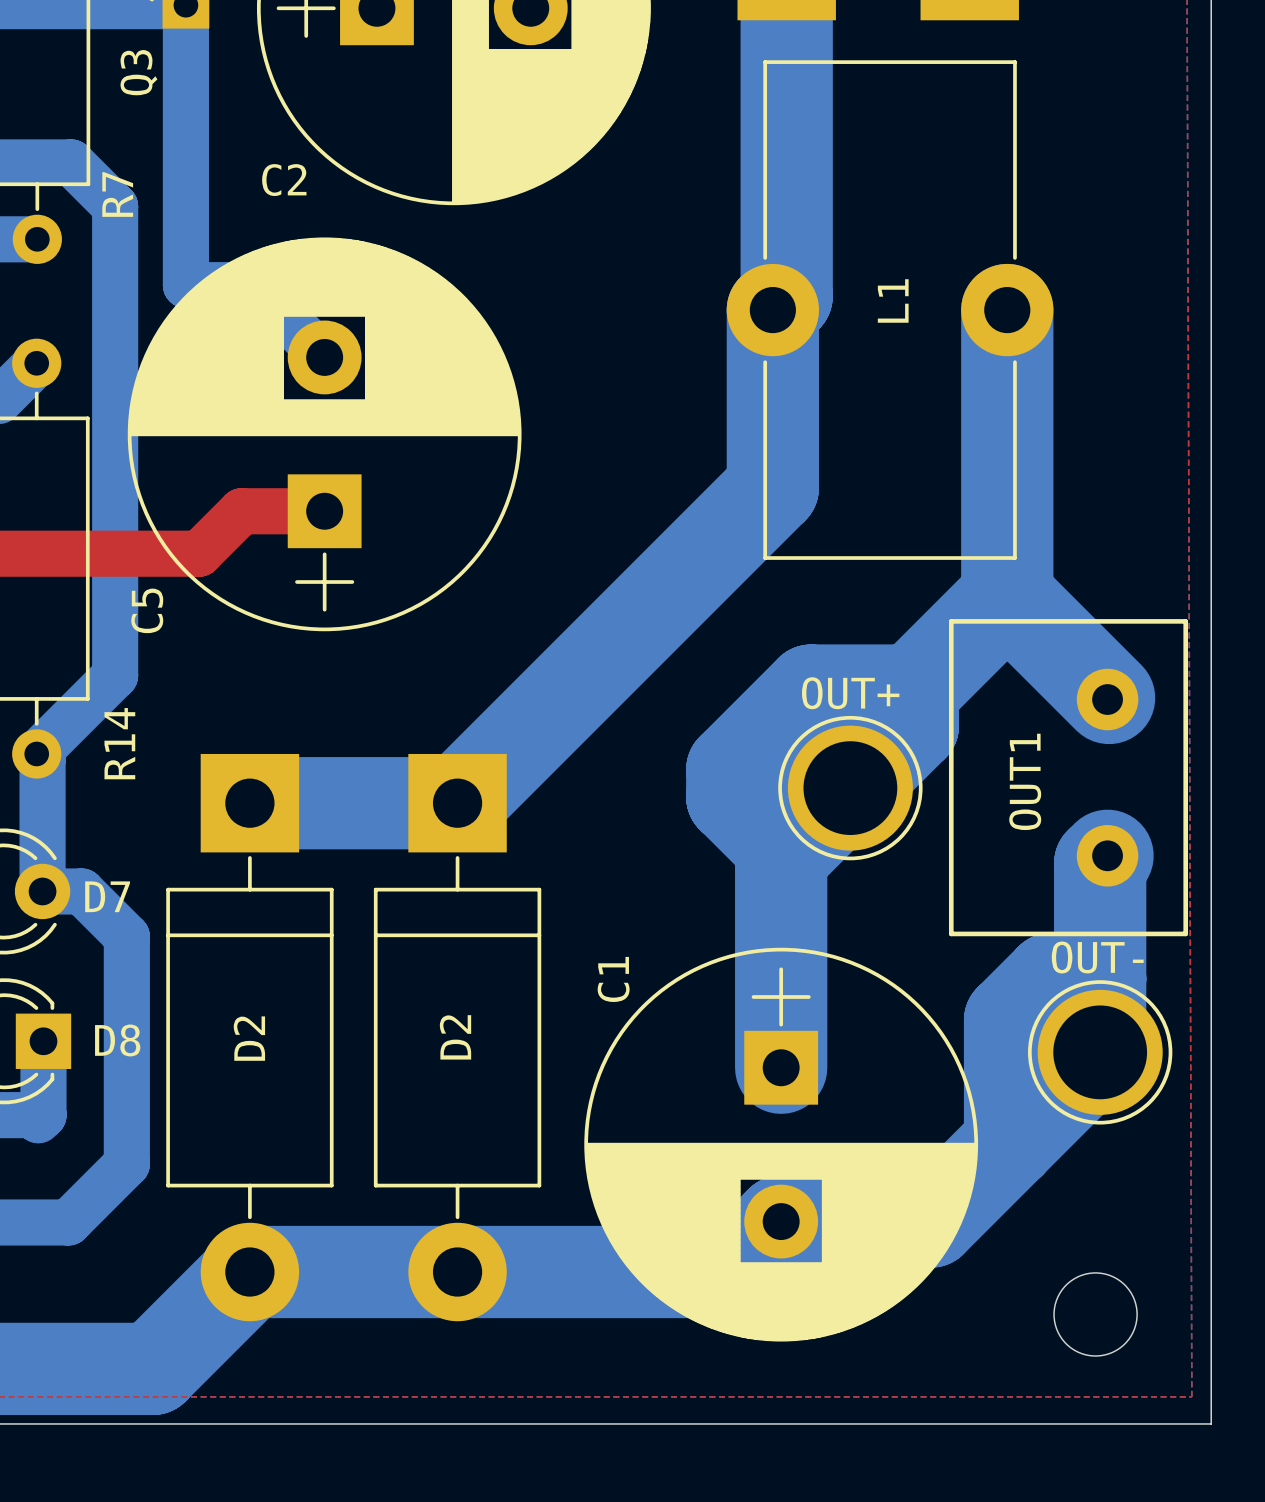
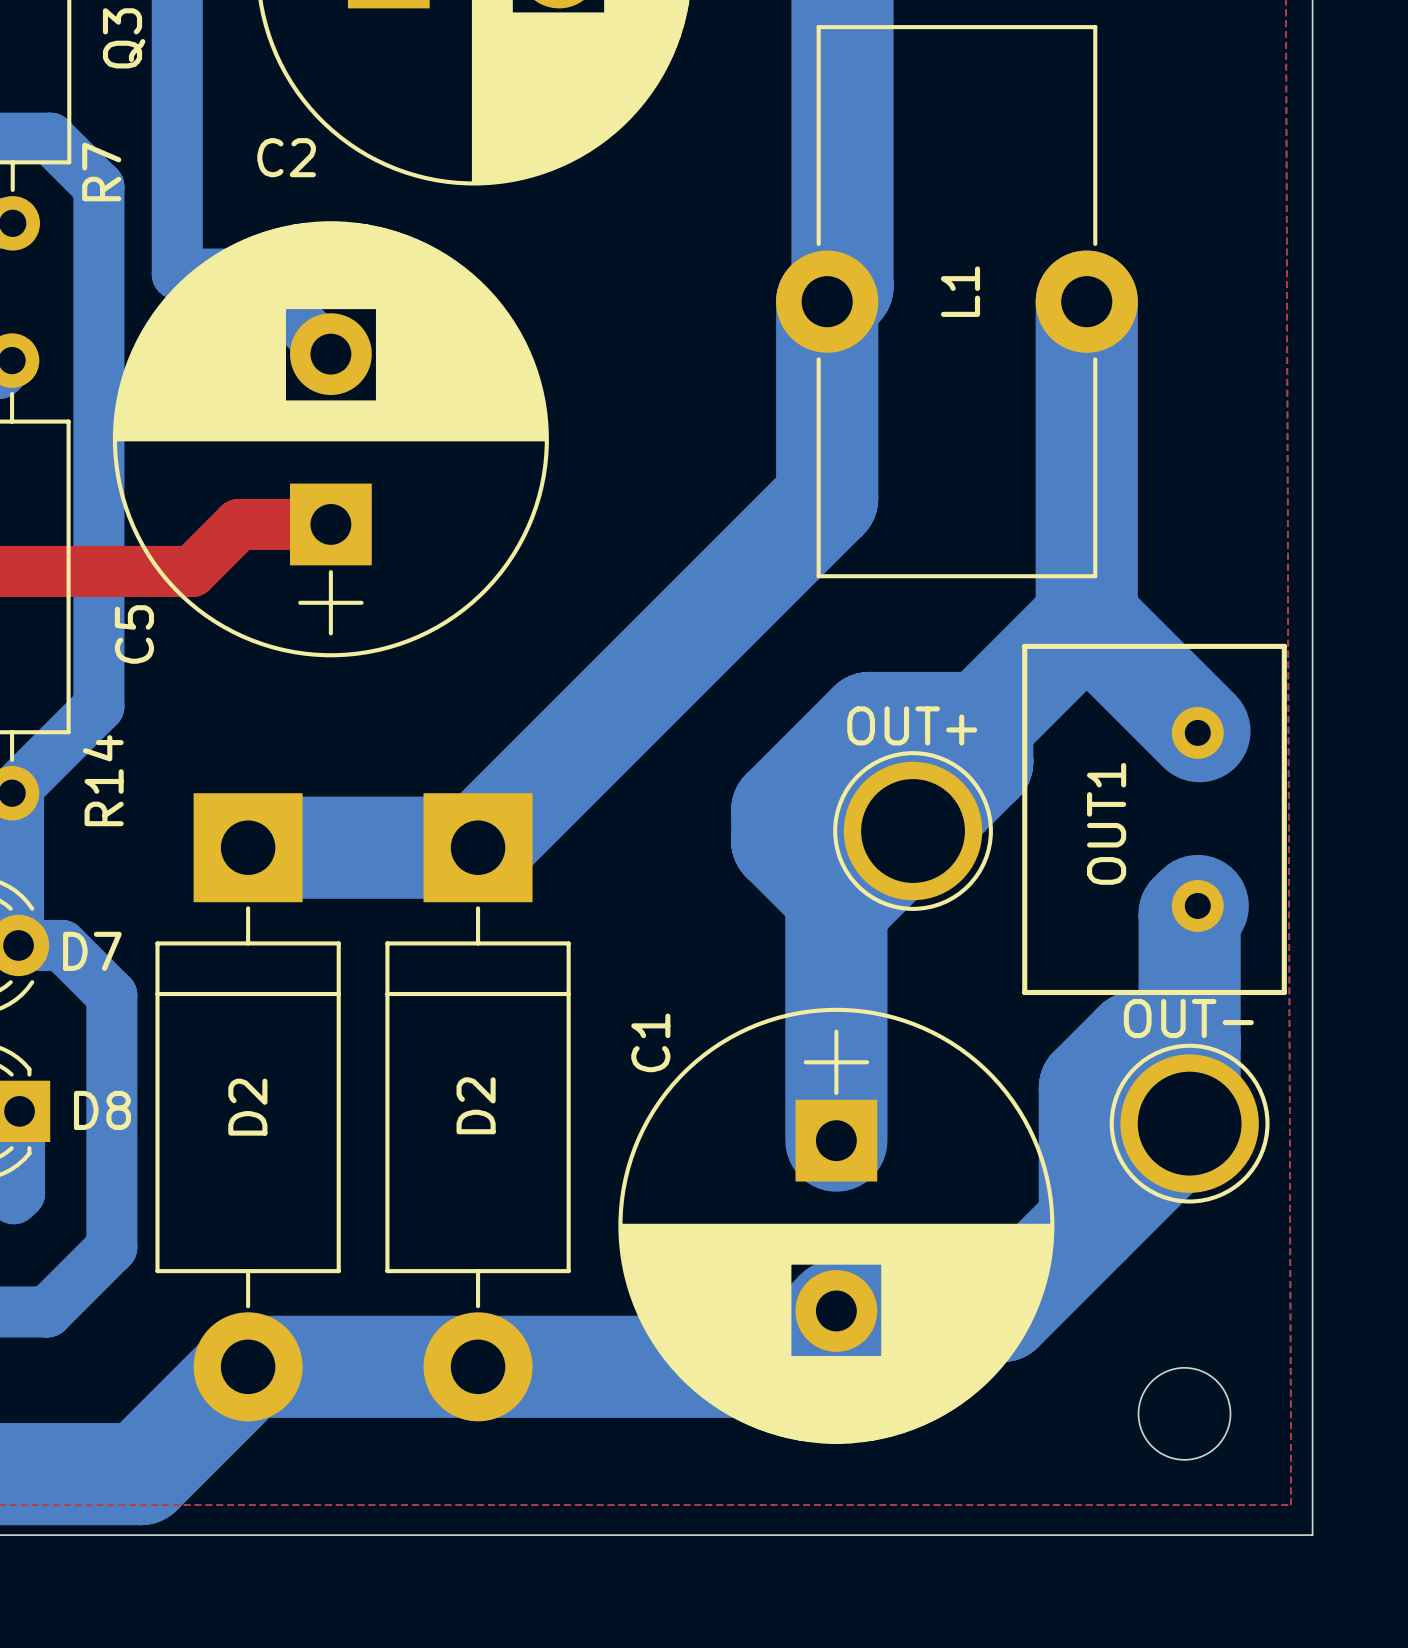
OUT1 footprint: [948, 619, 1189, 937] -> [1022, 643, 1287, 996]

